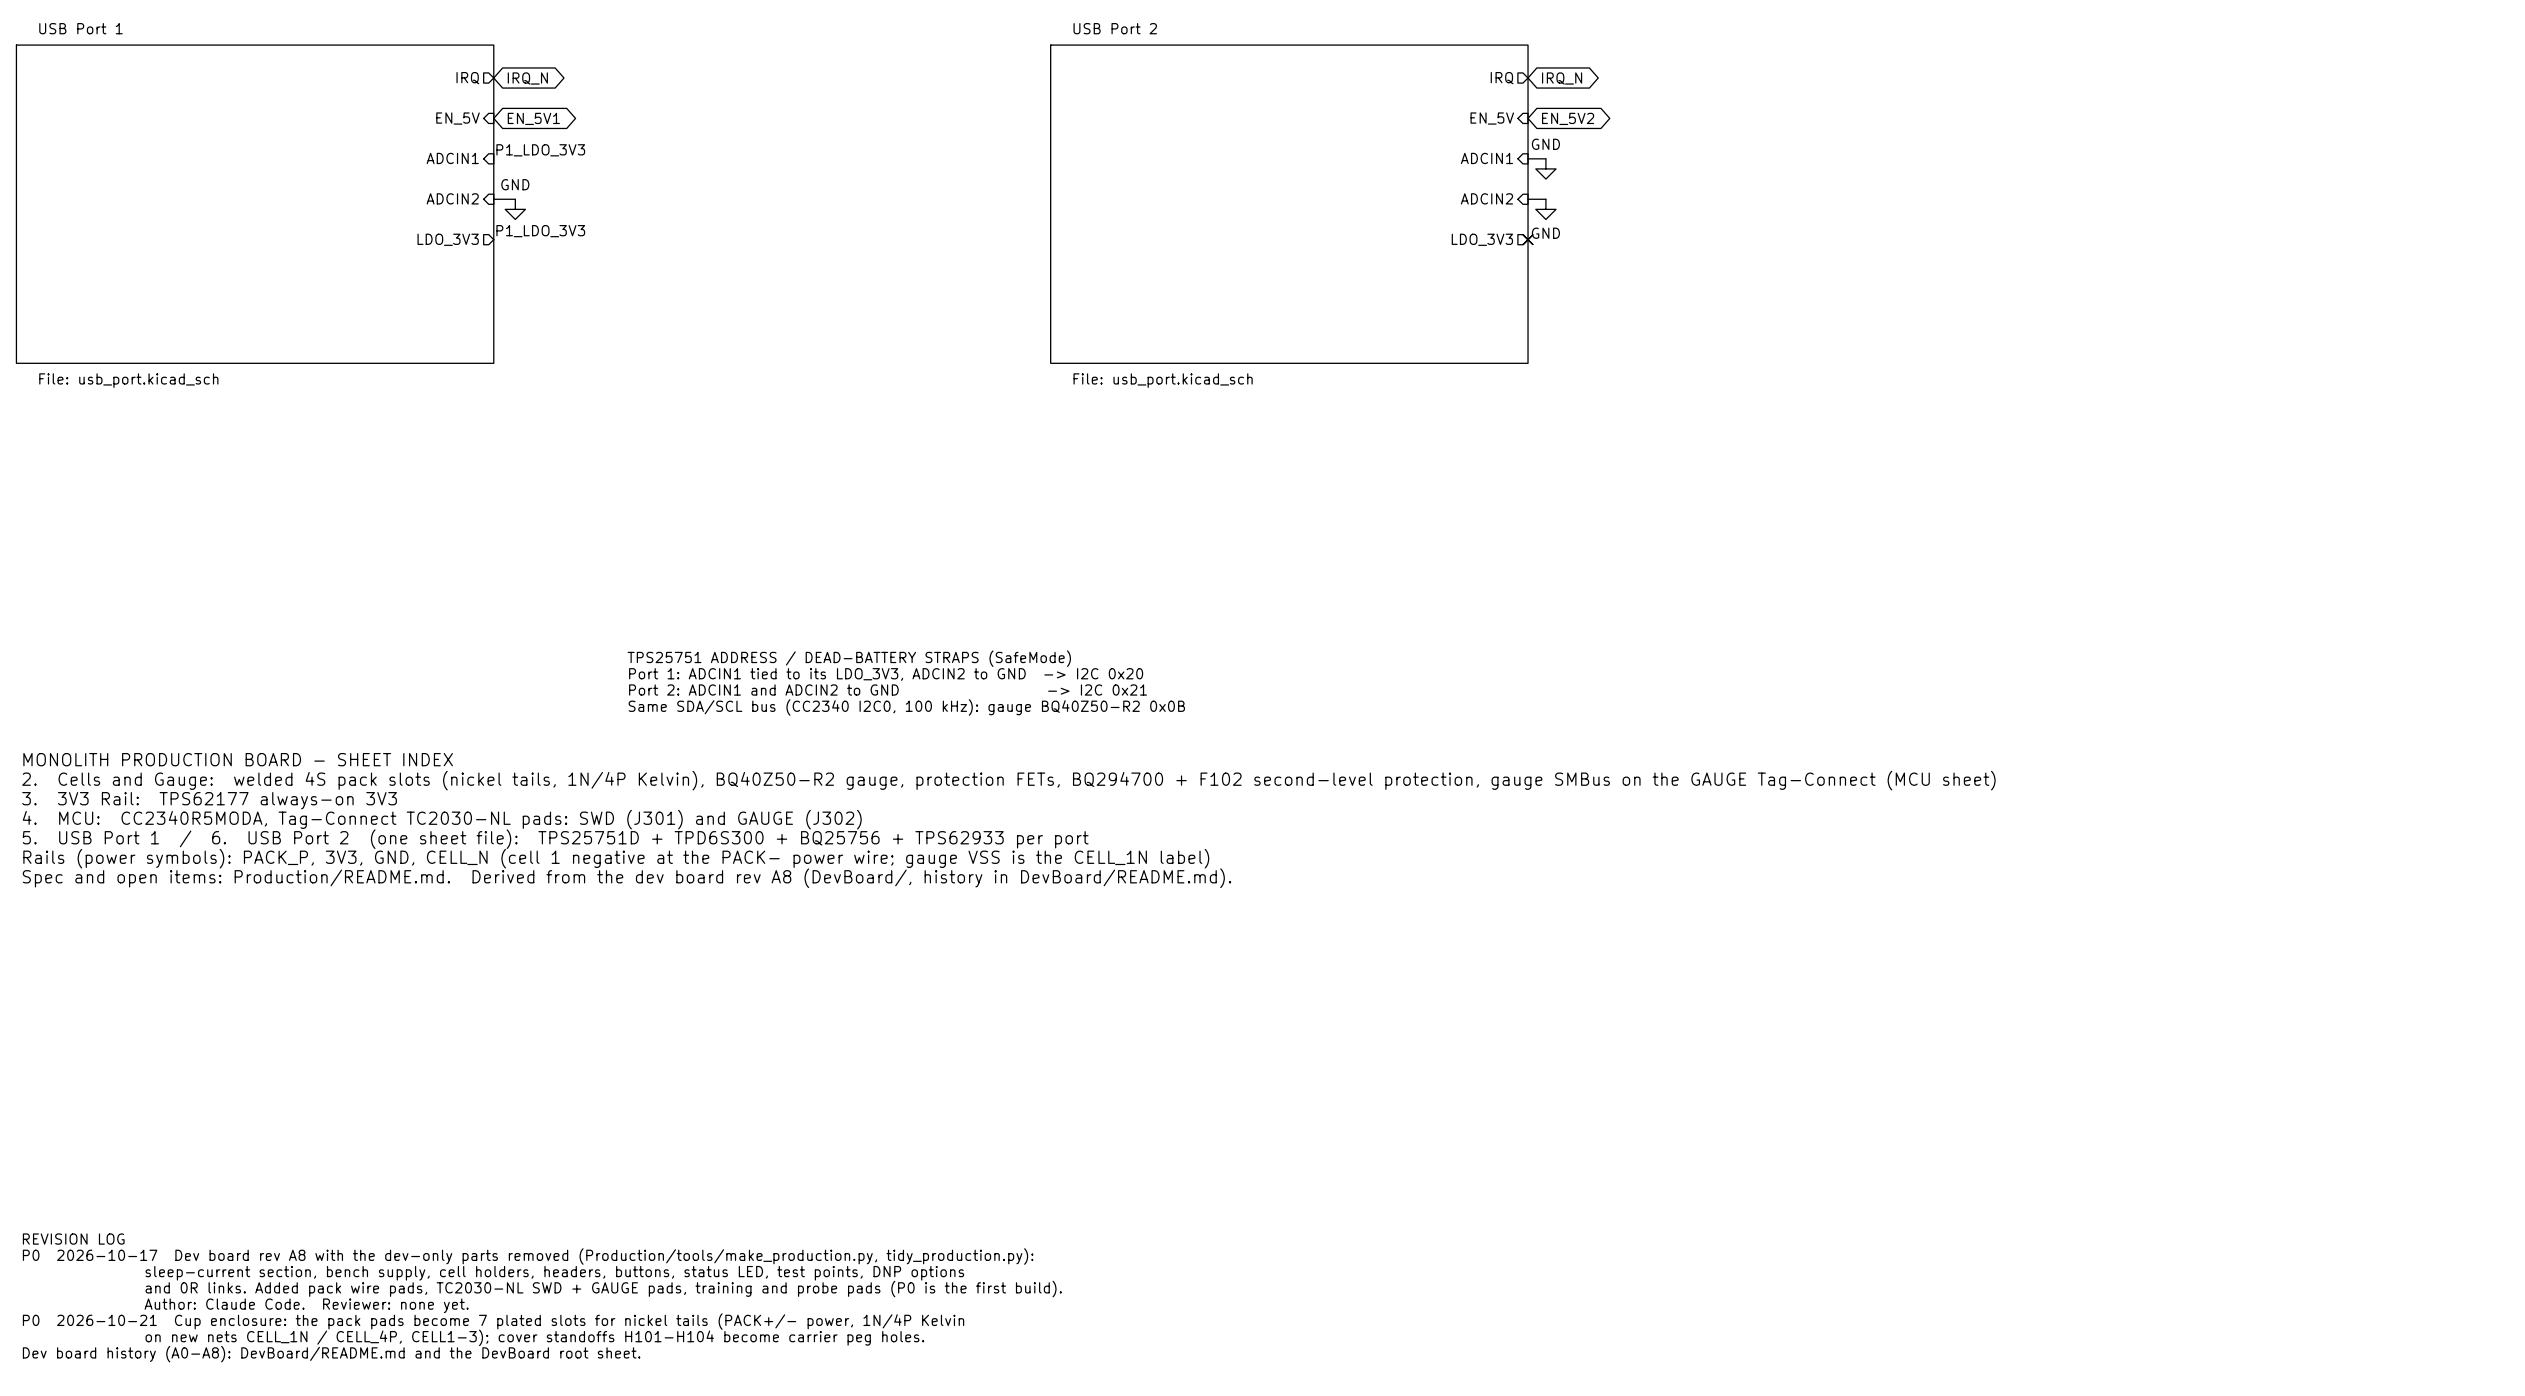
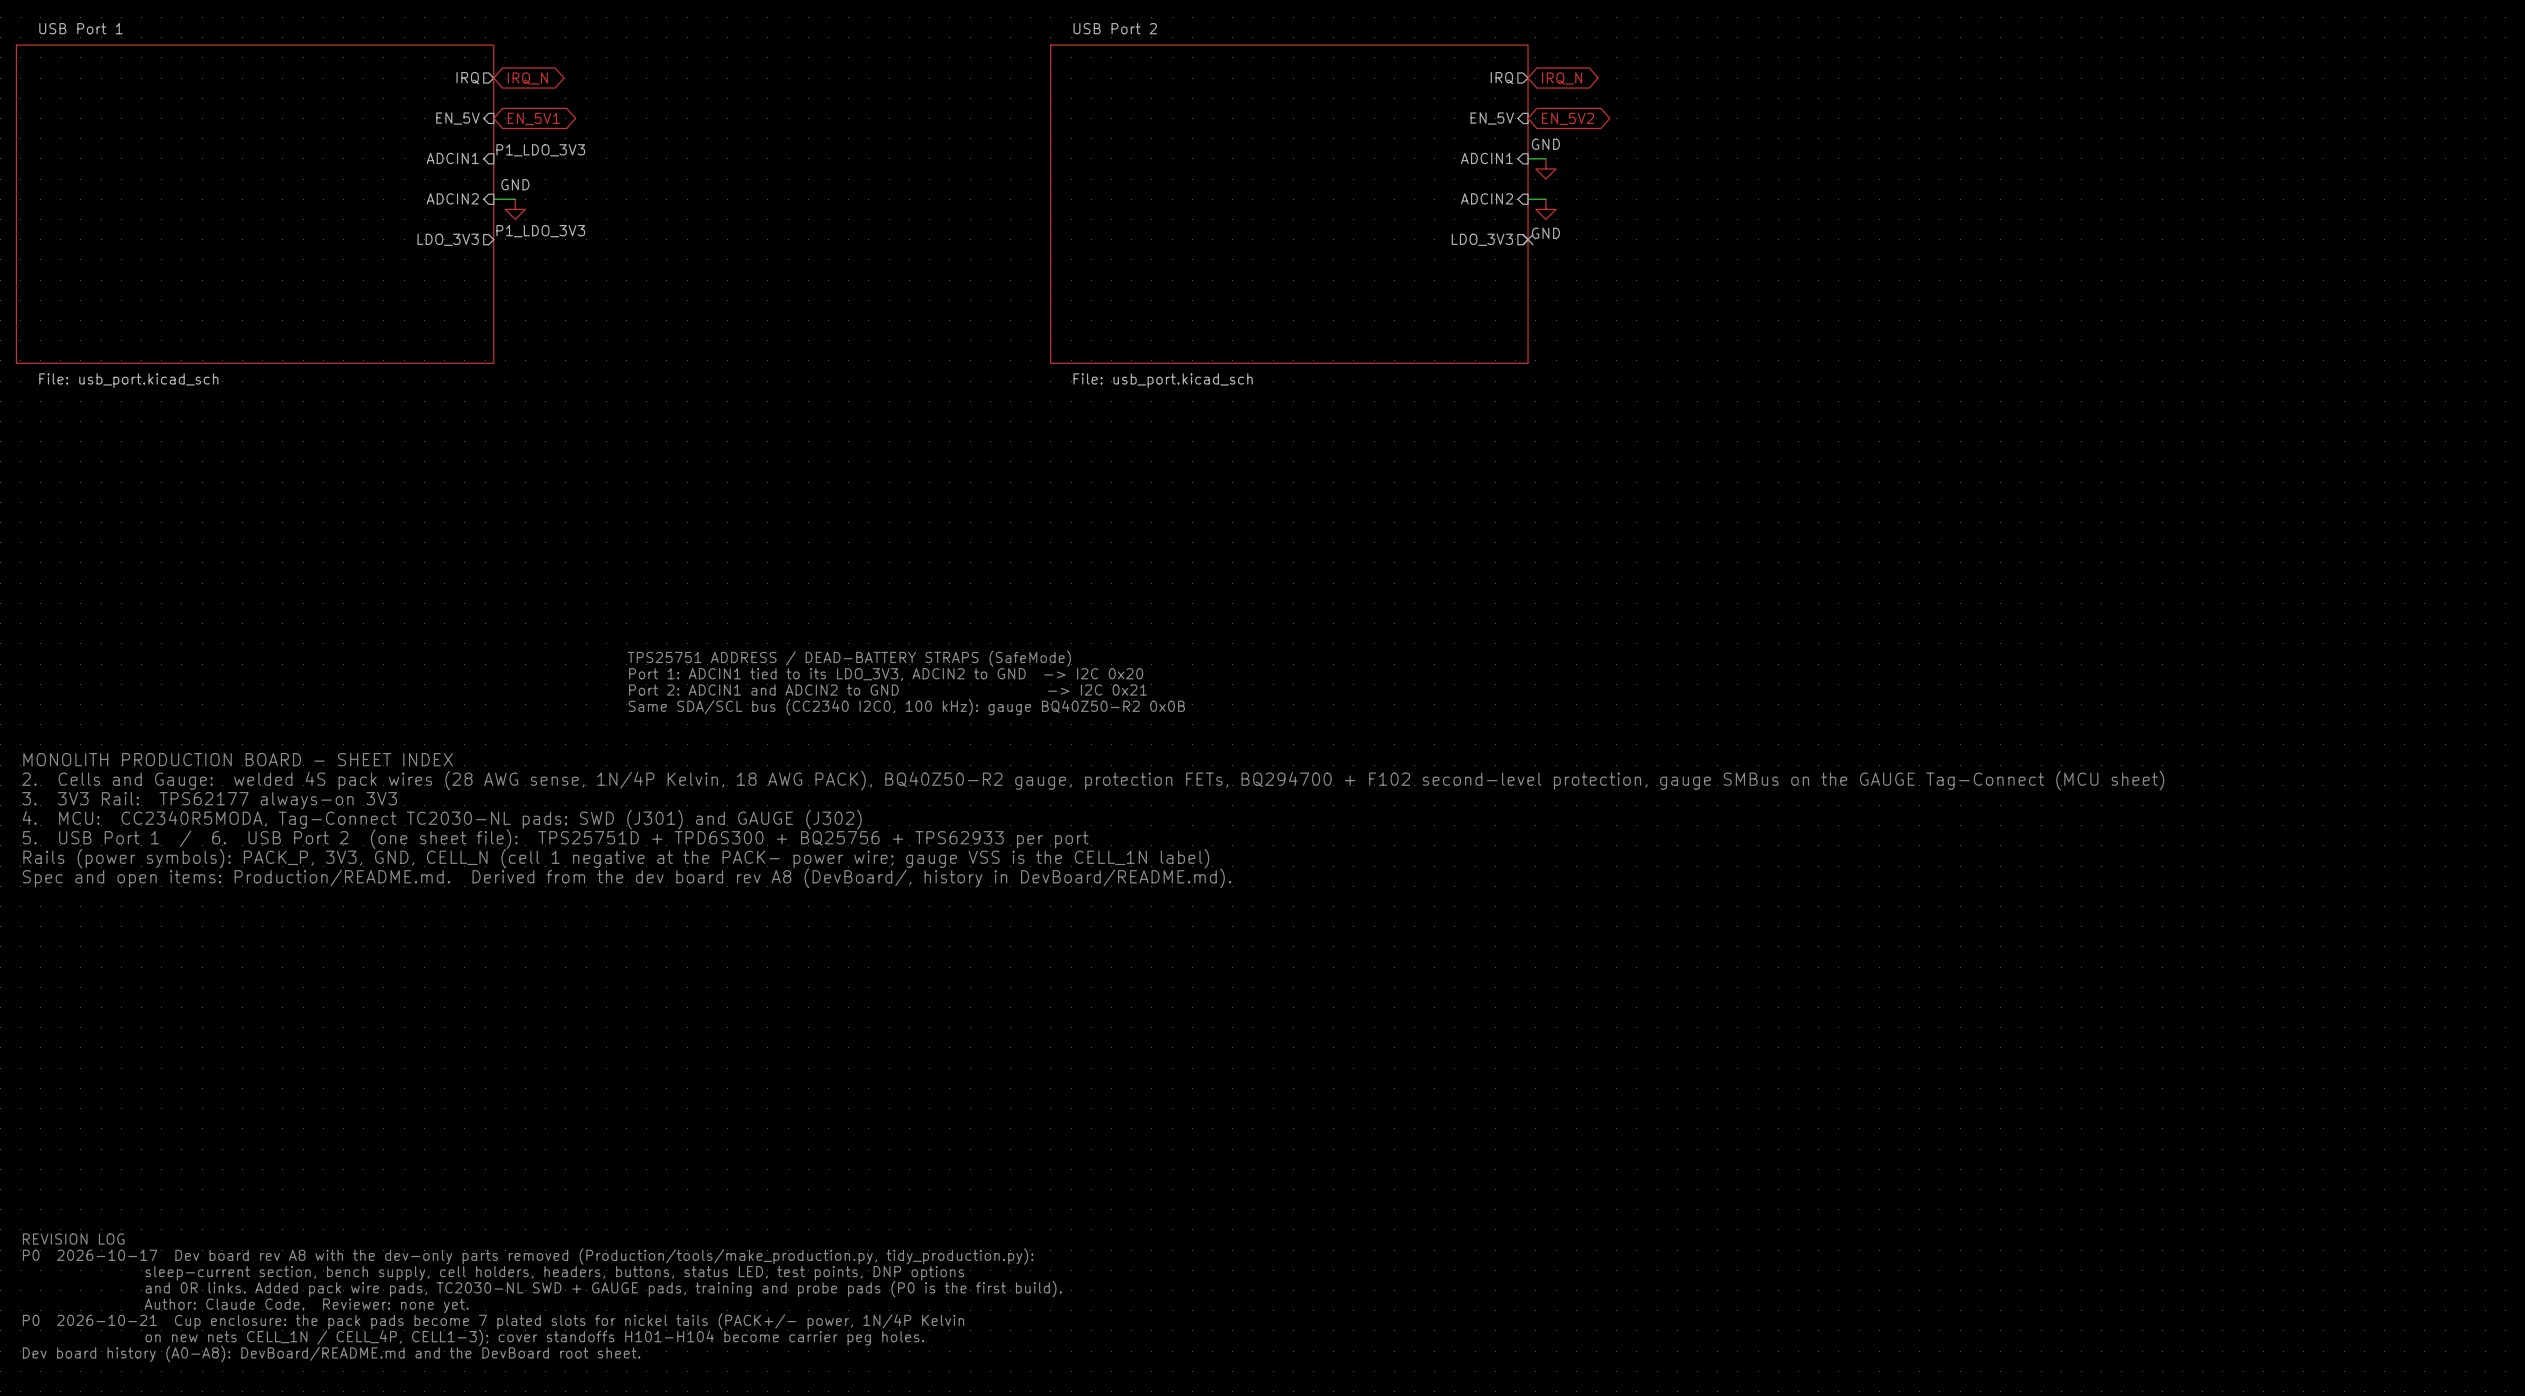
text: 2. Cells and Gauge: welded 4S pack slots (nickel tails, 1N/4P Kelvin), BQ40Z50-R2 gauge, protection FETs, BQ294700 + F102 second-level protection, gauge SMBus on the GAUGE Tag-Connect (MCU sheet) (1008, 780) -> 2. Cells and Gauge: welded 4S pack wires (28 AWG sense, 1N/4P Kelvin, 18 AWG PACK), BQ40Z50-R2 gauge, protection FETs, BQ294700 + F102 second-level protection, gauge SMBus on the GAUGE Tag-Connect (MCU sheet) (1093, 780)

